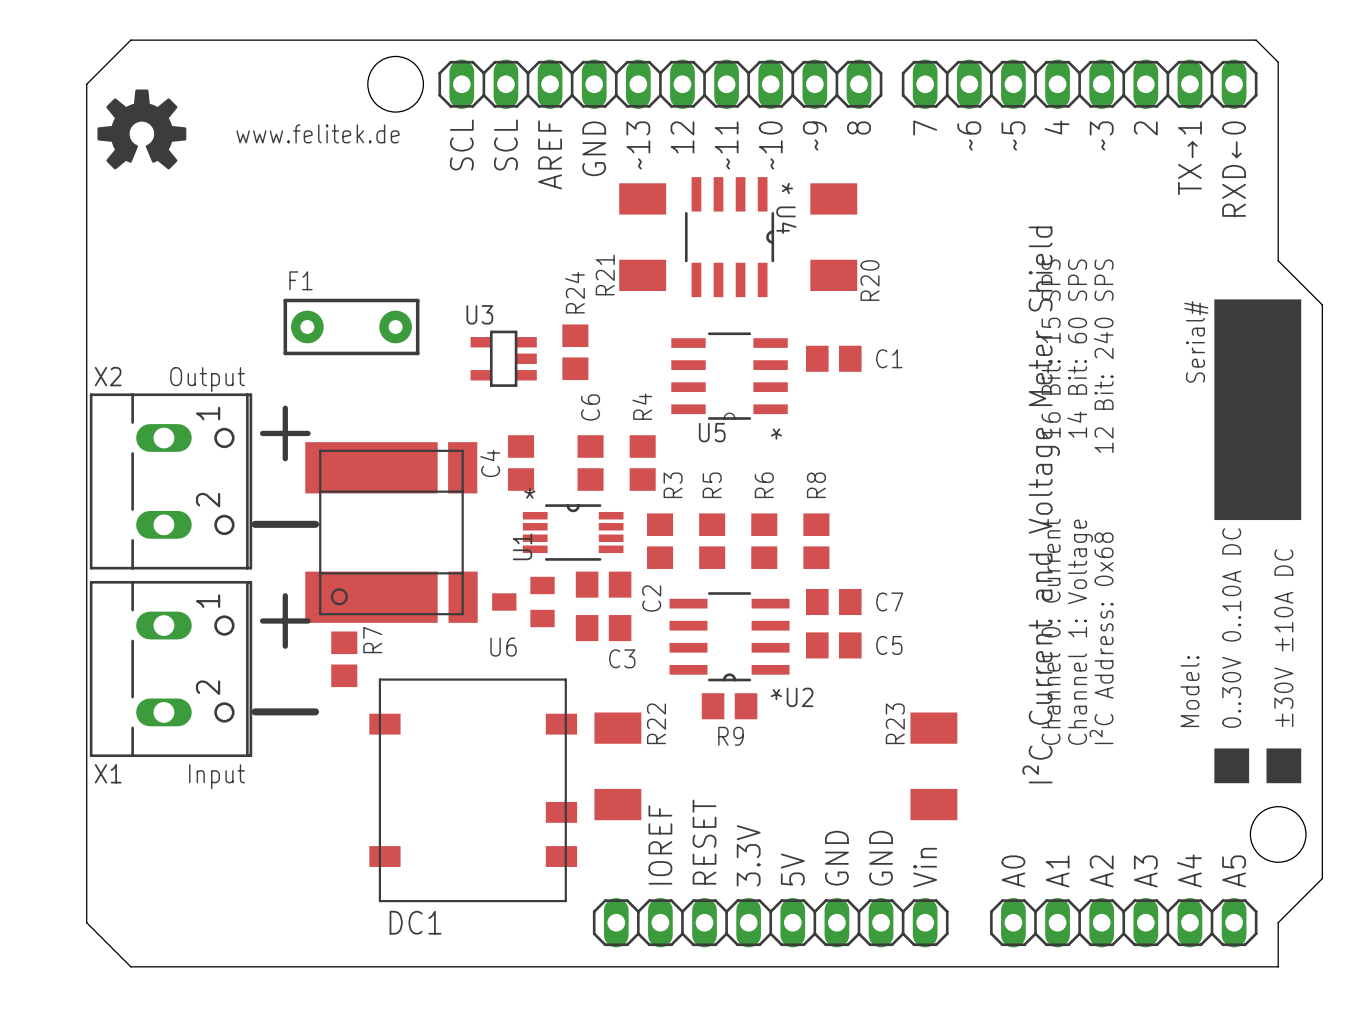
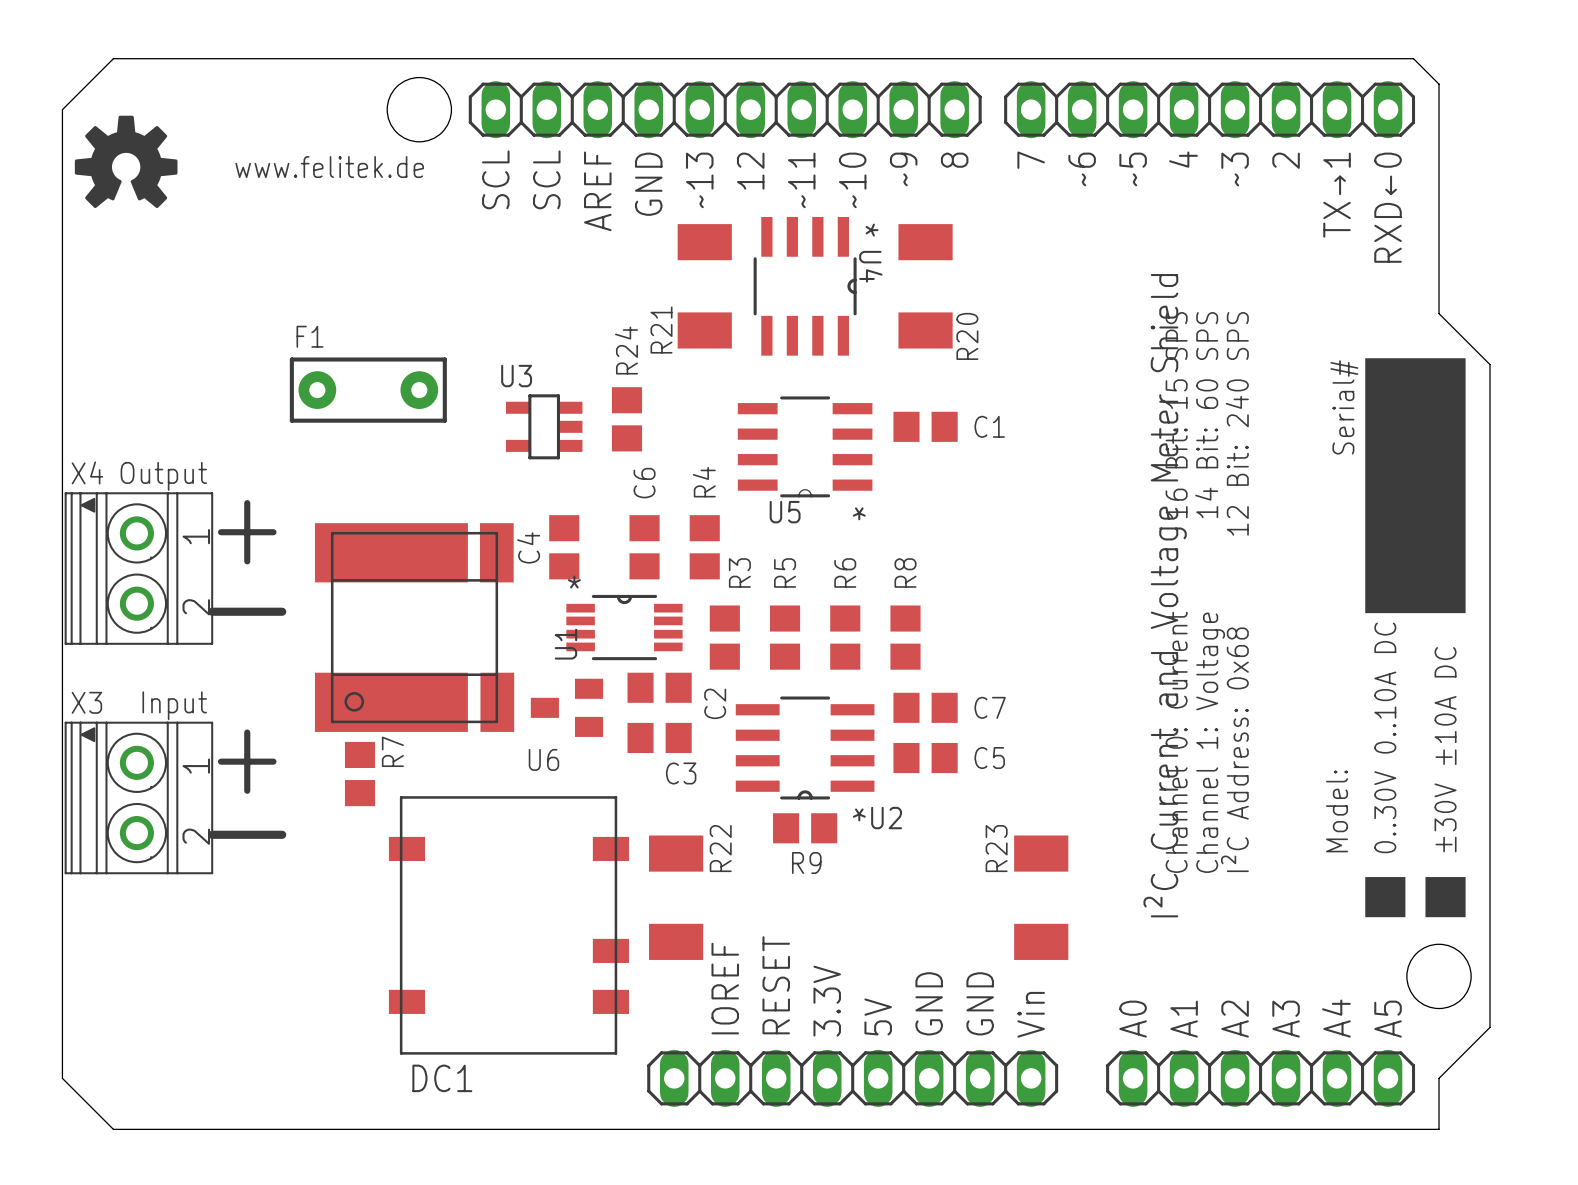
text position: Output (207, 379) -> Output (163, 476)
text position: + (285, 433) -> + (247, 532)
X4: none -> (138, 568)
X2: (171, 481) -> none
text position: - (285, 524) -> - (247, 611)
text position: + (285, 620) -> + (247, 761)
X1: (171, 669) -> none
X3: none -> (138, 797)
text position: - (285, 711) -> - (247, 834)
text position: Input (217, 776) -> Input (174, 705)

